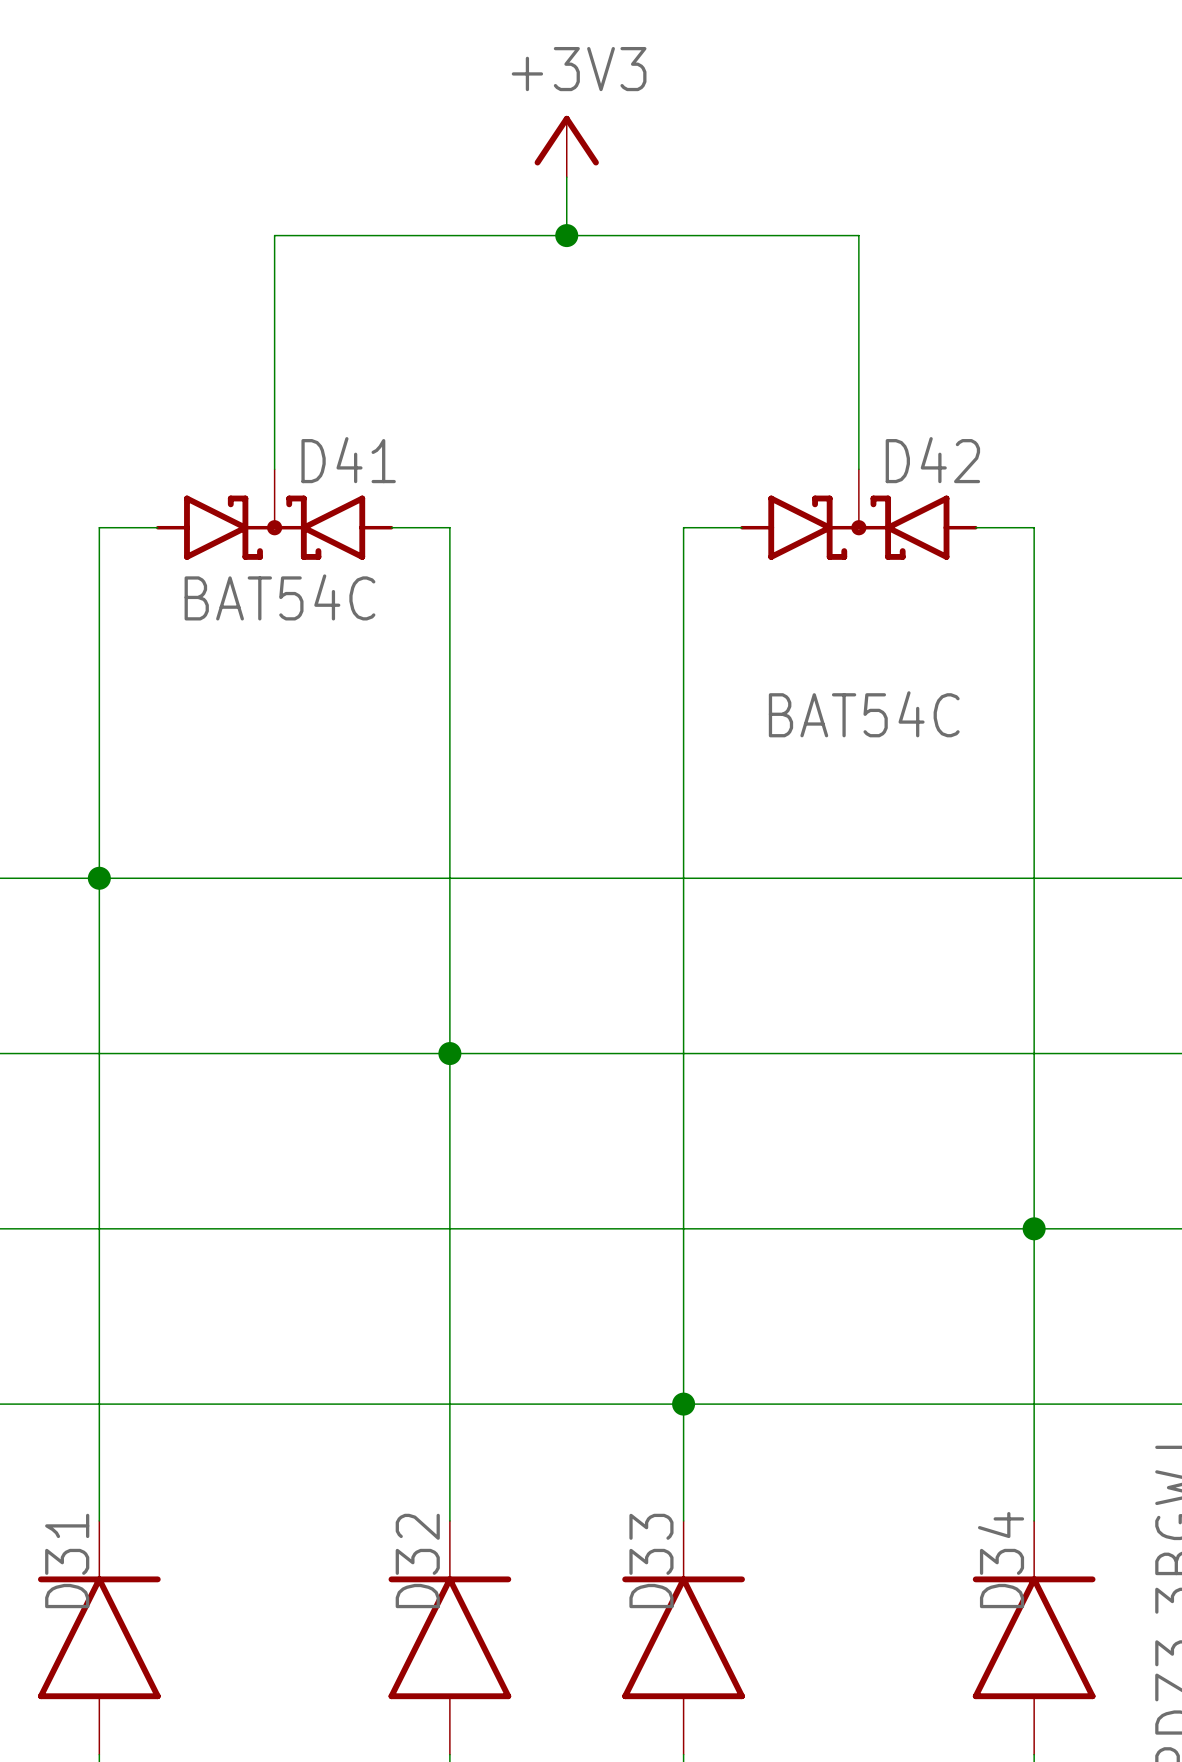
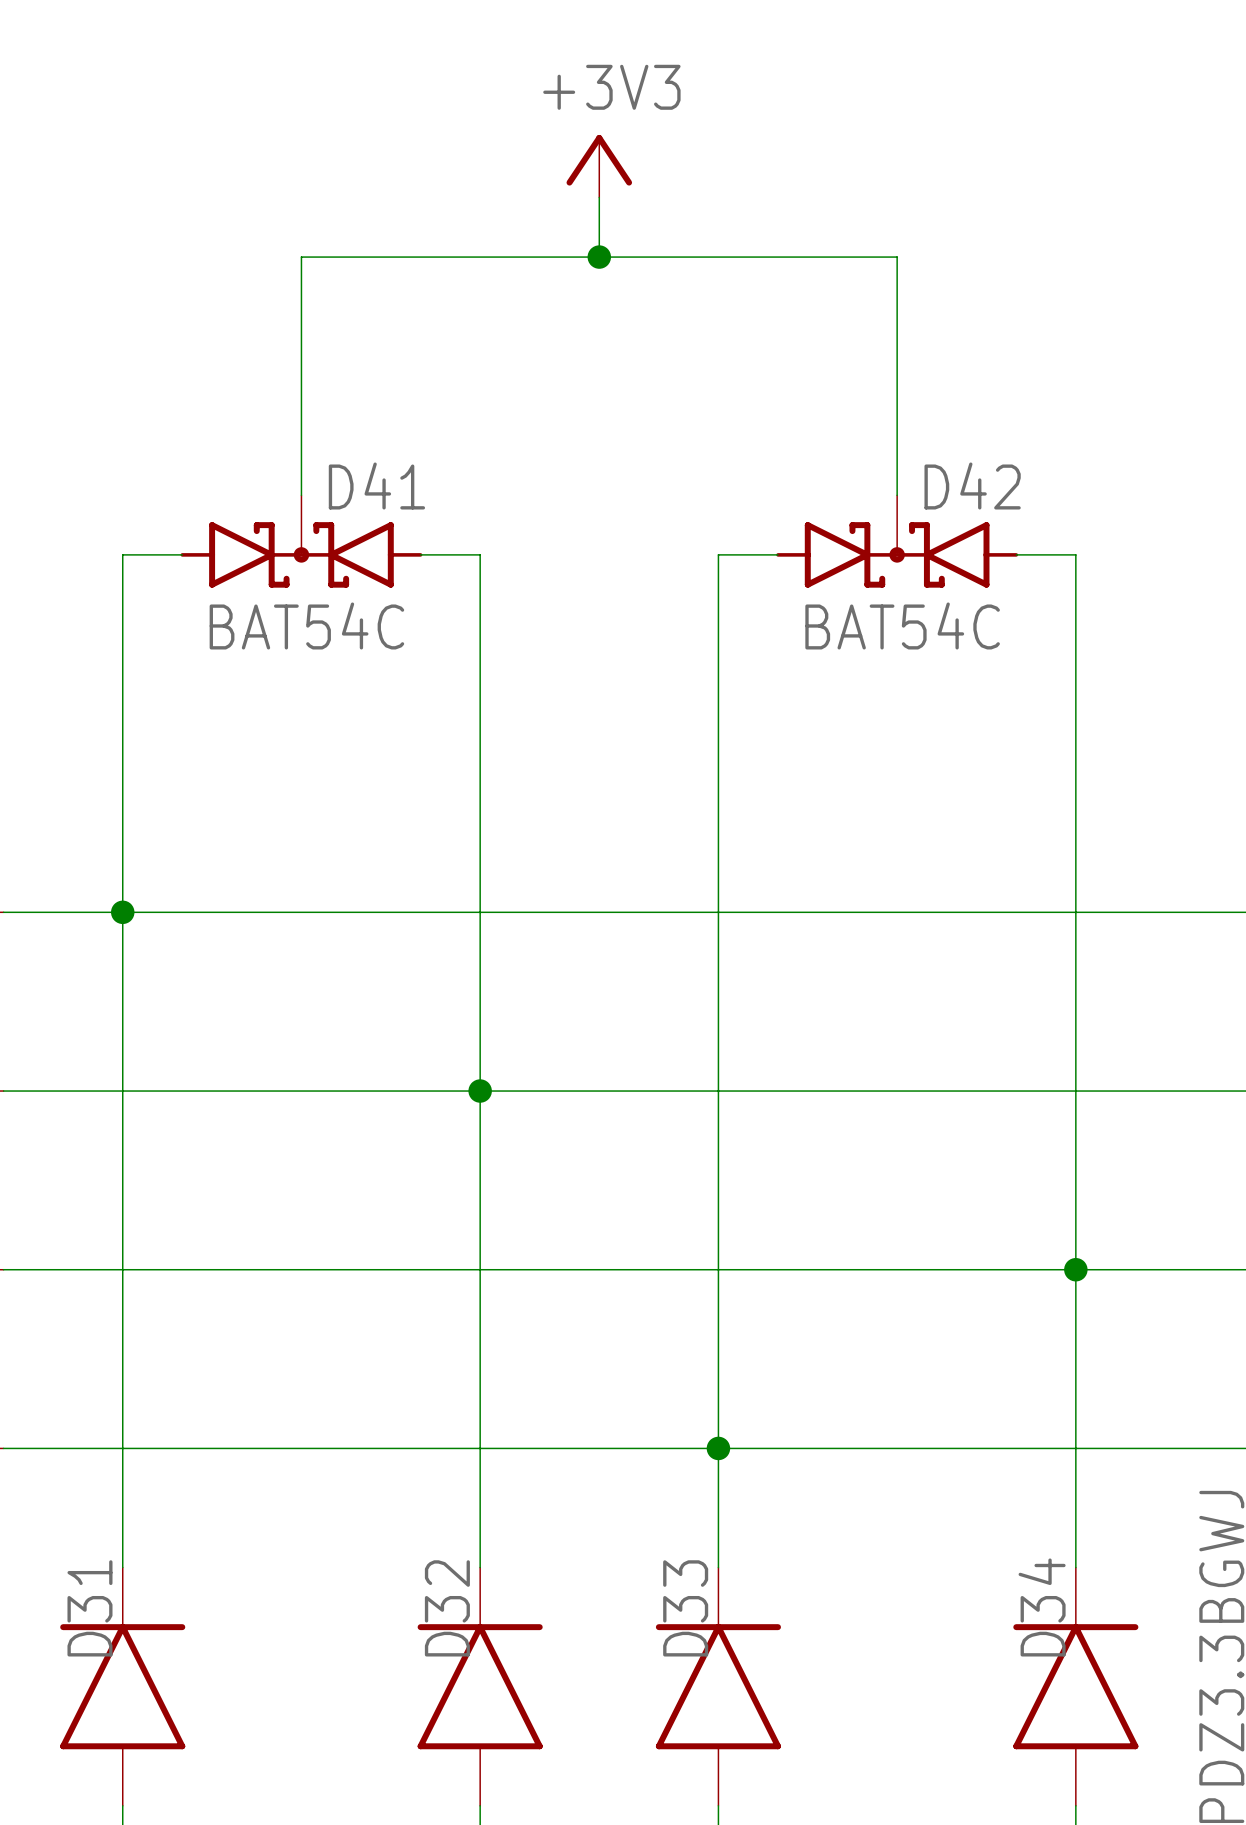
D42 value position: BAT54C (864, 714) -> BAT54C (902, 625)

